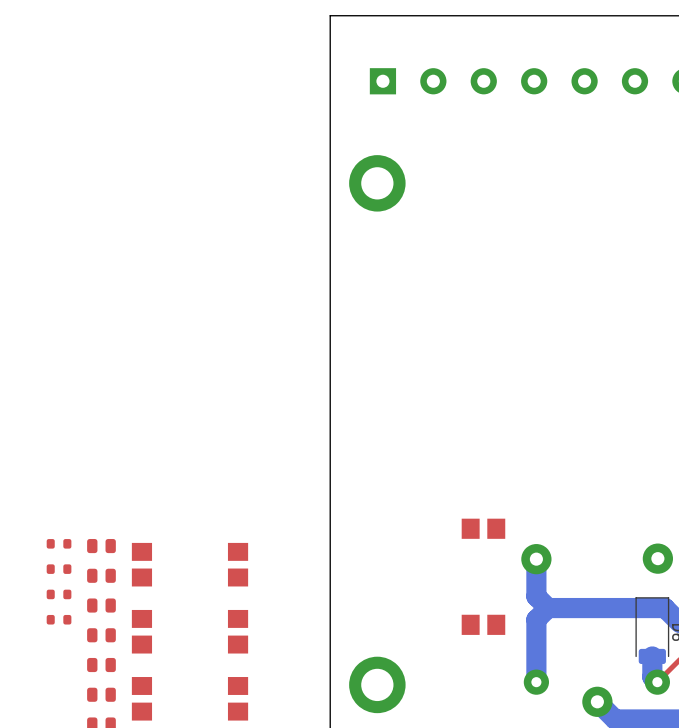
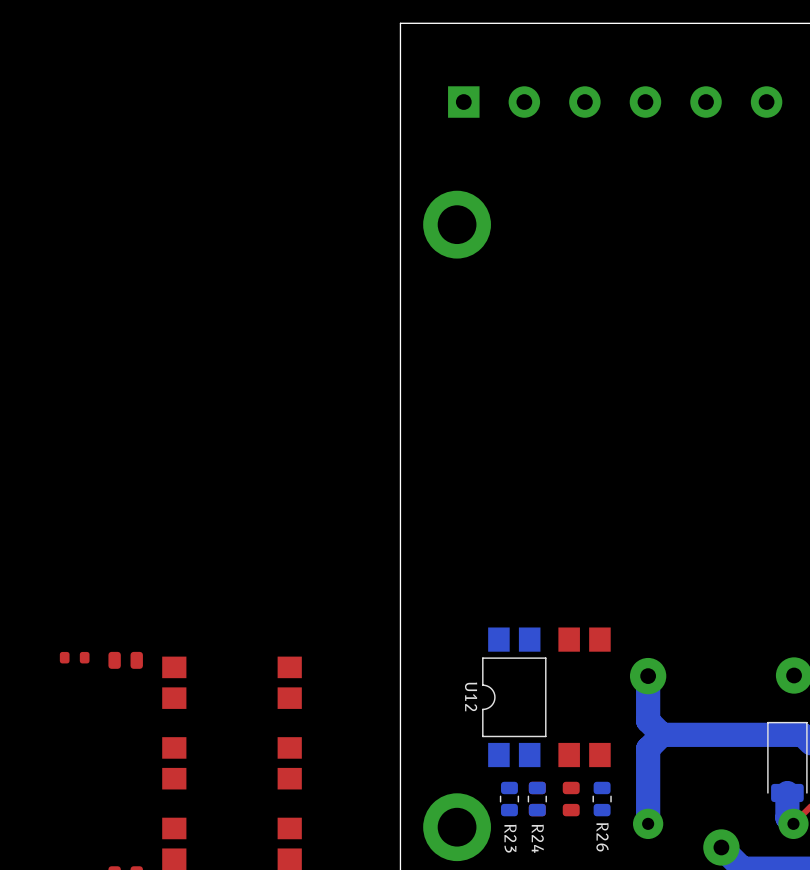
part: (59, 569) -> none
part: (101, 575) -> none
U12: none -> (514, 697)
part: (59, 594) -> none
part: (101, 605) -> none
part: (59, 619) -> none
part: (101, 635) -> none
R23: none -> (509, 799)
R24: none -> (537, 799)
part: none -> (571, 799)
R26: none -> (602, 799)
part: (101, 665) -> none
part: (101, 694) -> none

